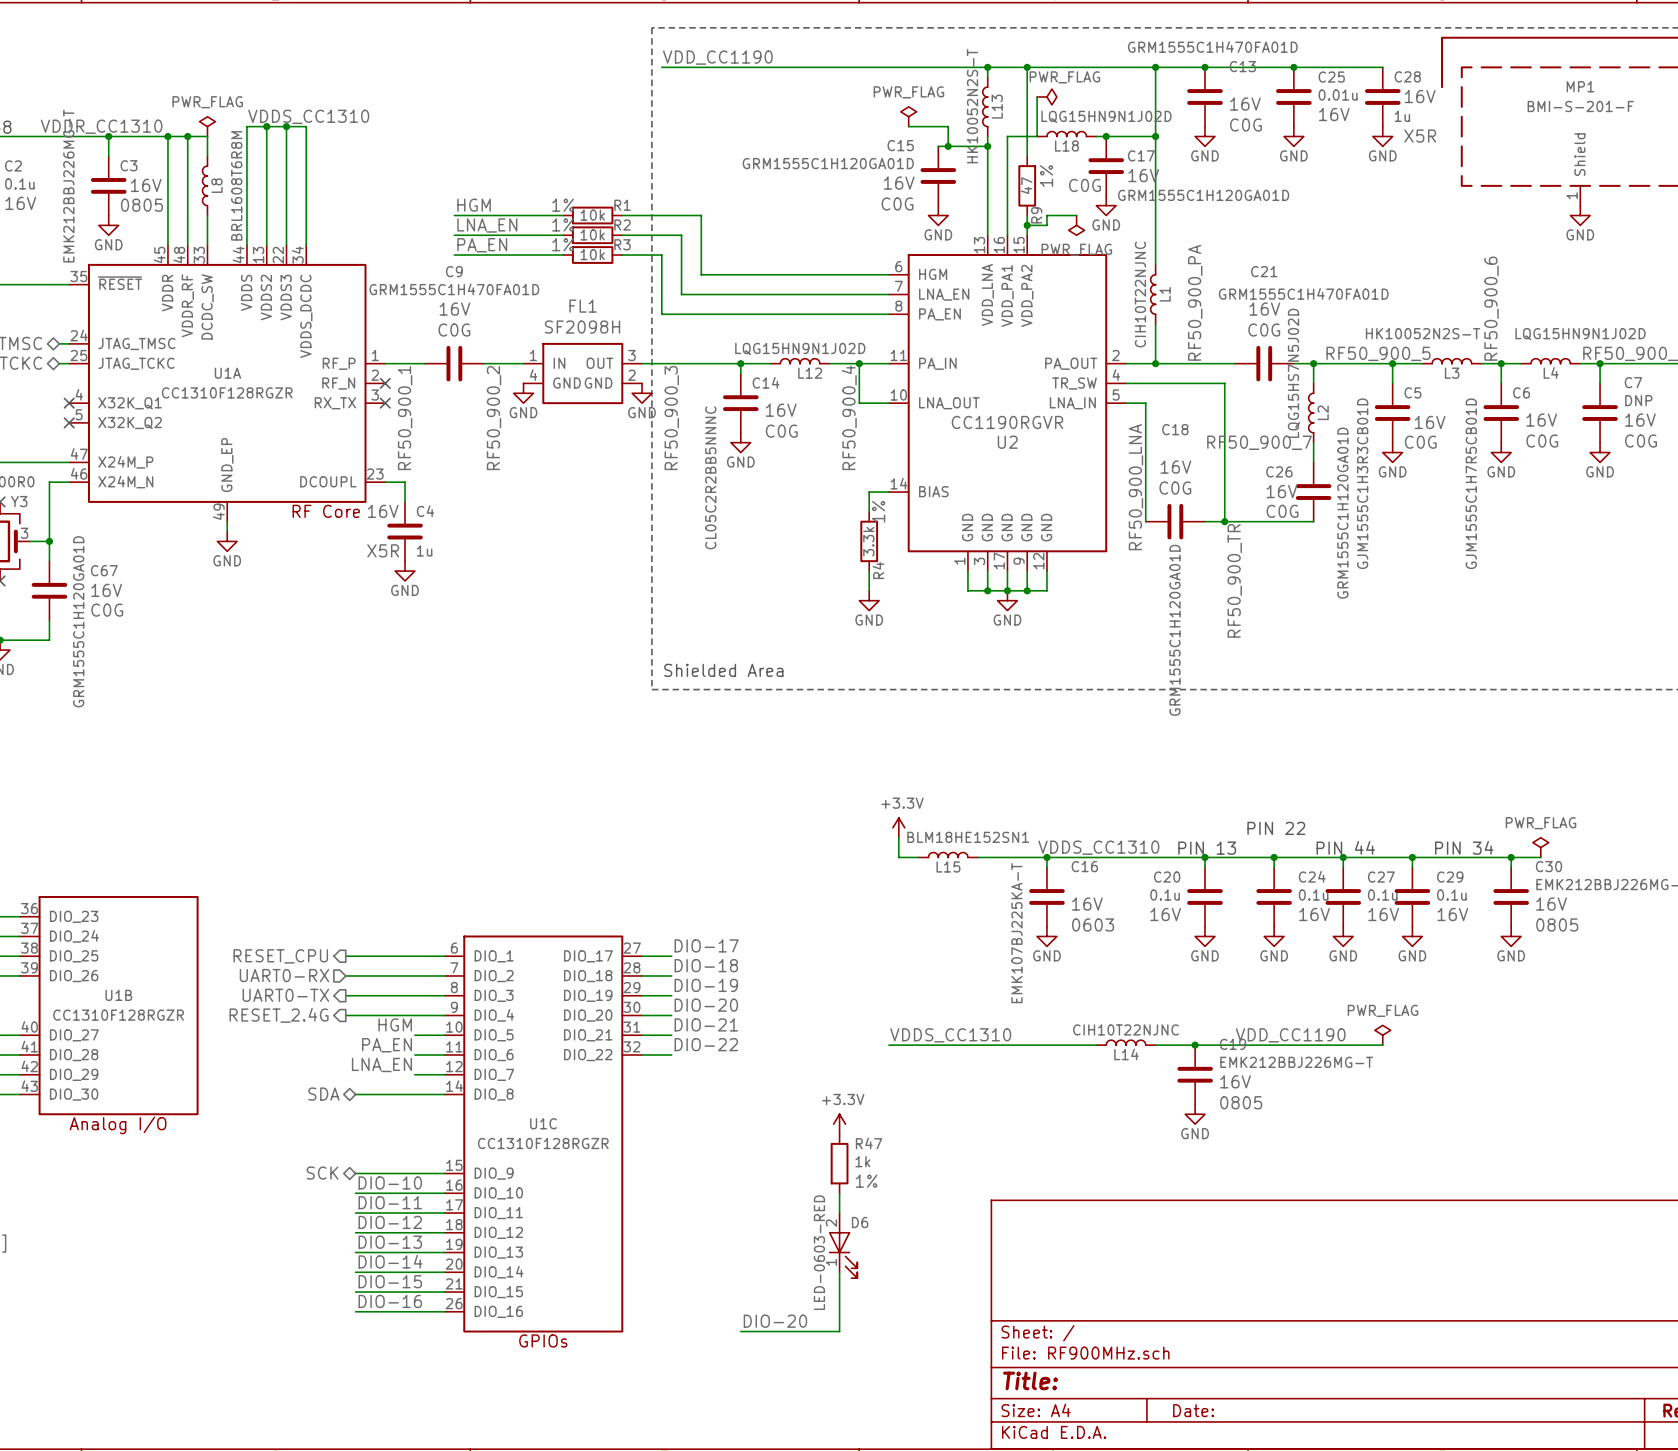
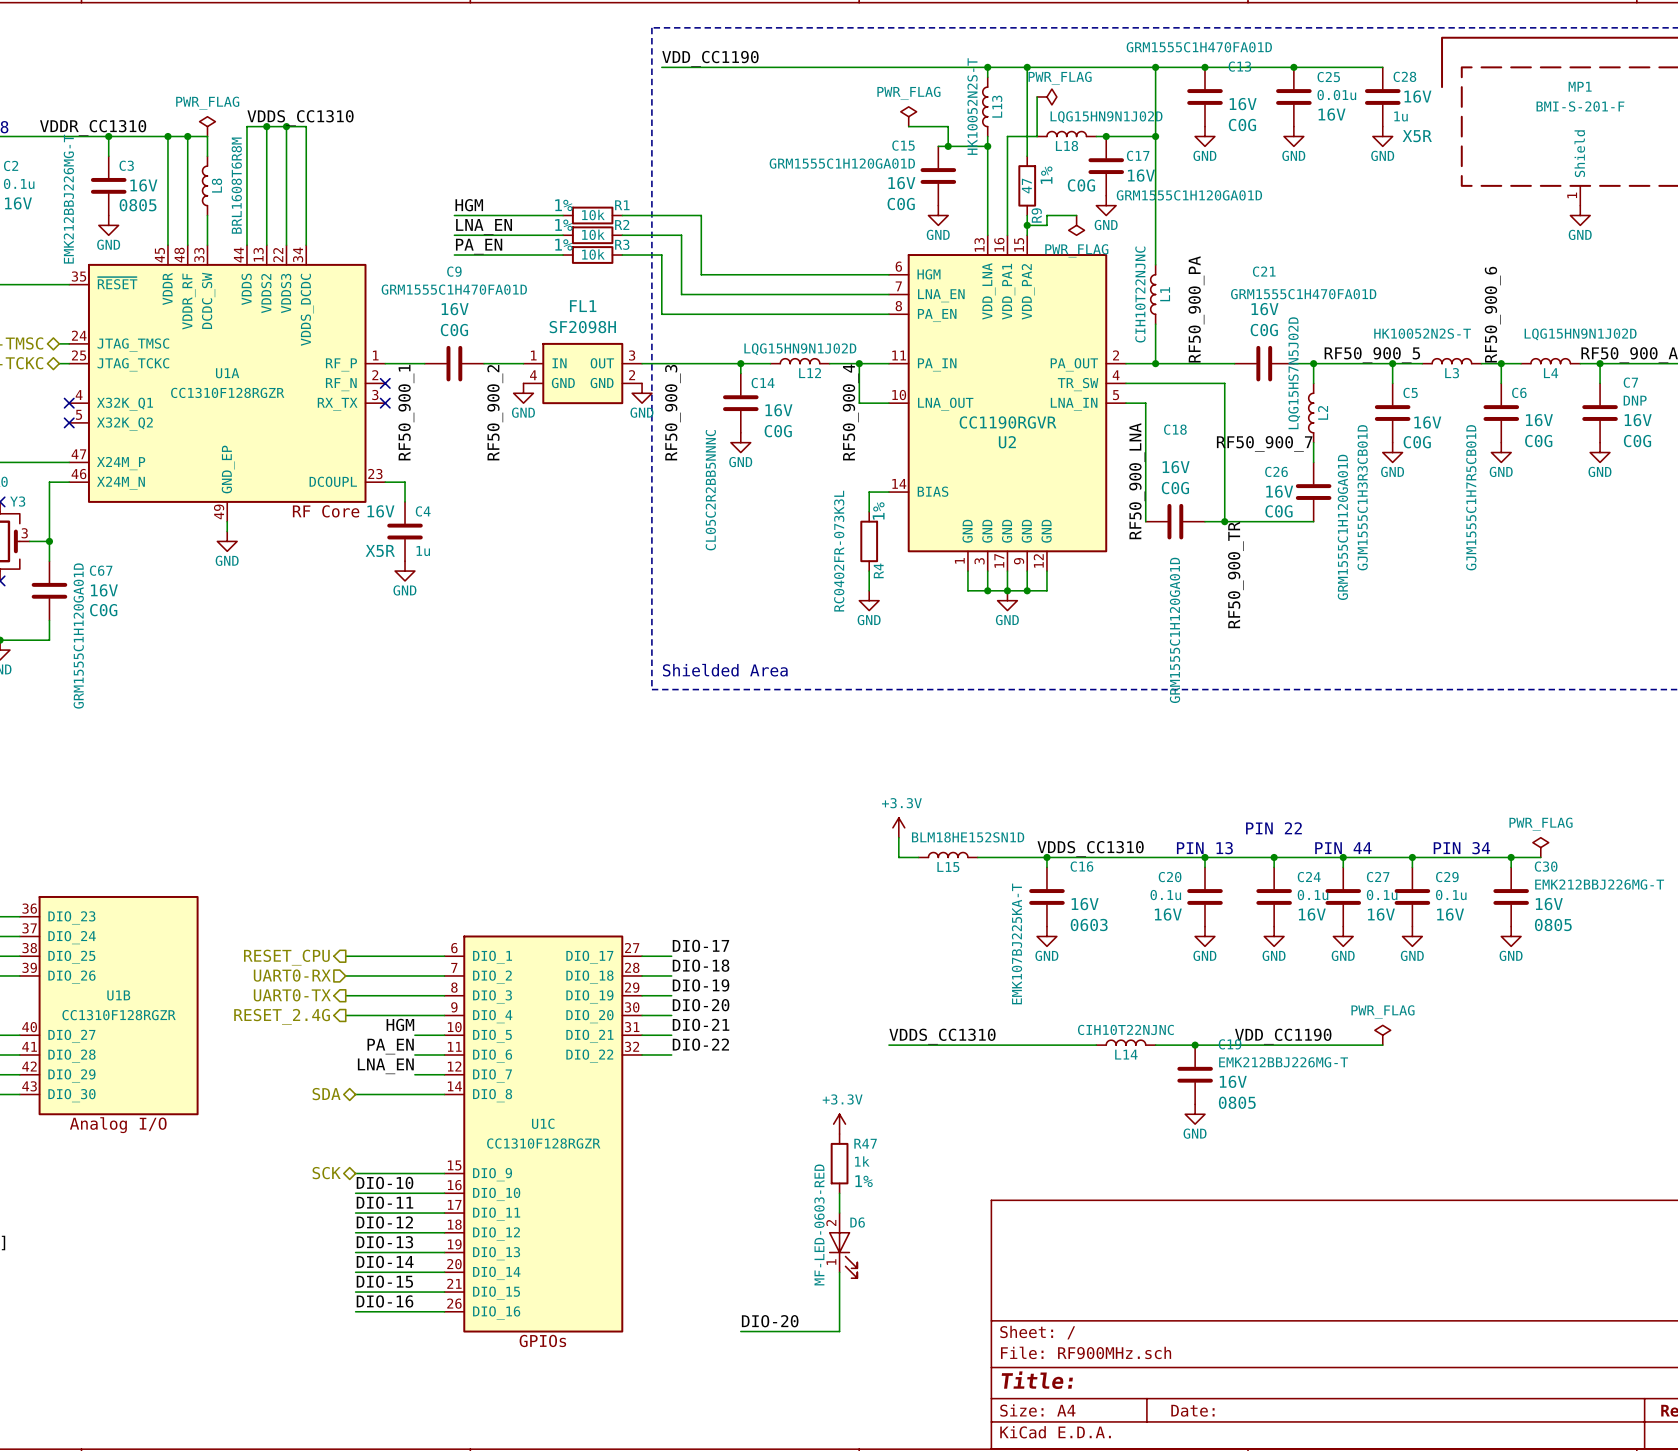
R4 value: 3.3k (868, 541) -> RC0402FR-073K3L (839, 551)
L15 value: BLM18HE152SN1 (968, 837) -> BLM18HE152SN1D (968, 837)
D6 value: LED-0603-RED (819, 1252) -> MF-LED-0603-RED (819, 1224)

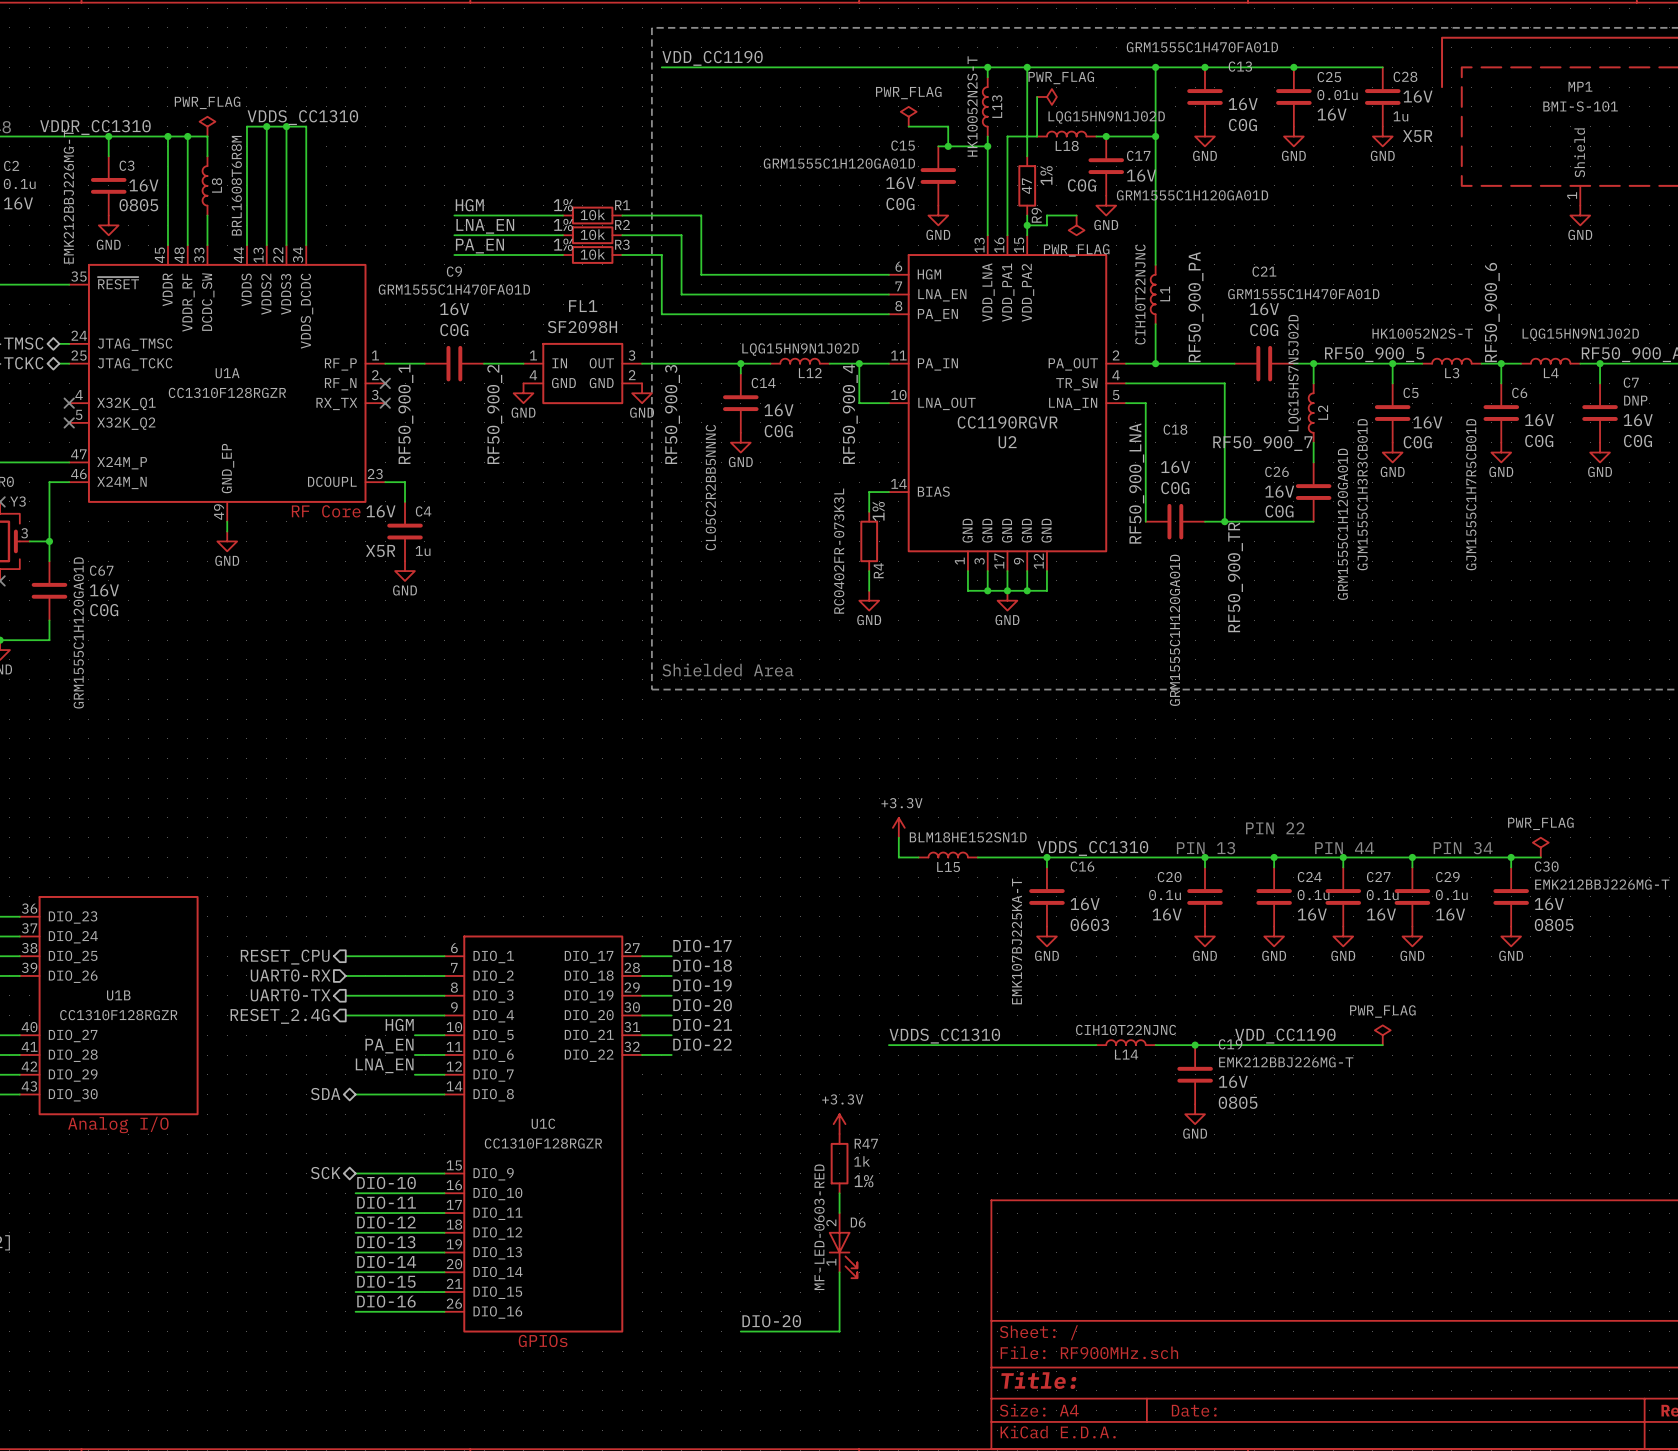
MP1 value: BMI-S-201-F (1580, 106) -> BMI-S-101 (1580, 106)

